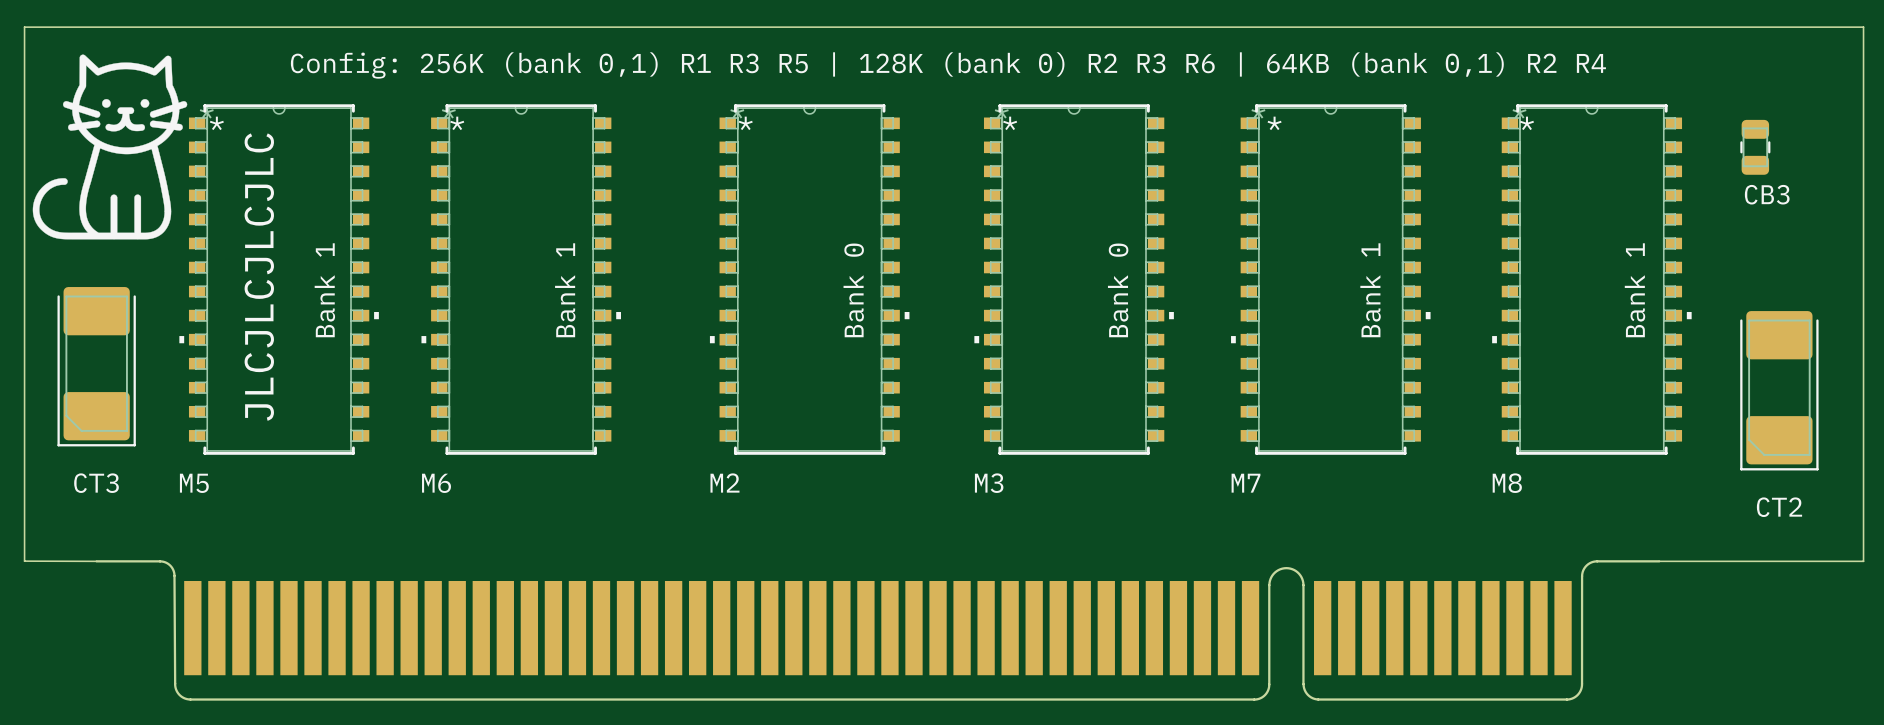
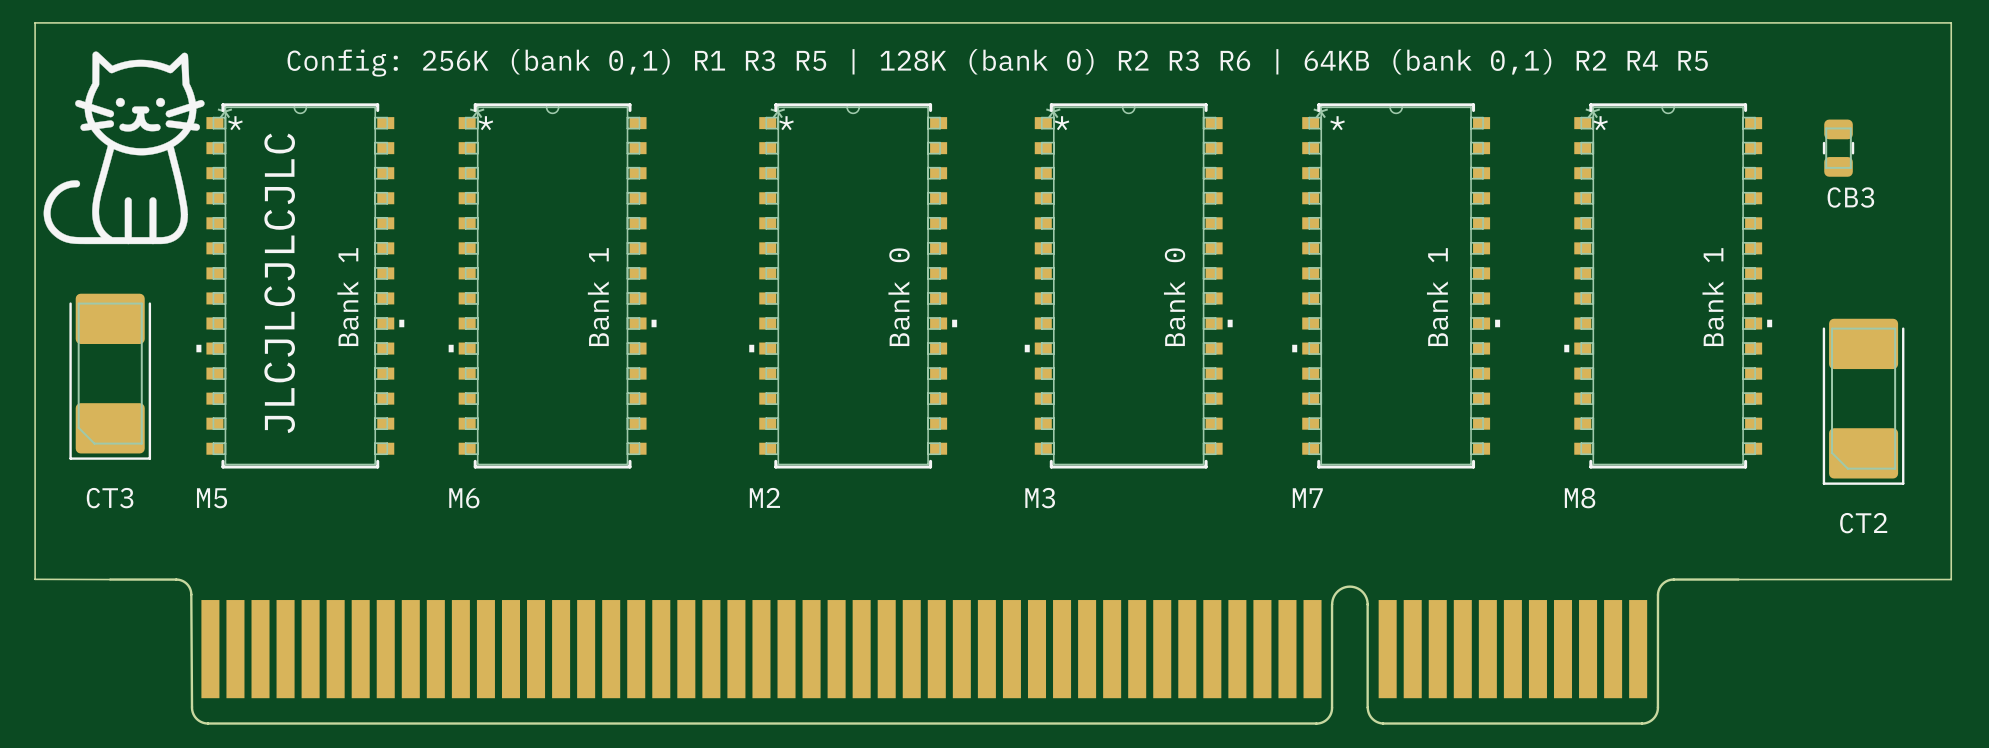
text: Config: 256K (bank 0,1) R1 R3 R5 | 128K (bank 0) R2 R3 R6 | 64KB (bank 0,1) R2 R4 (948, 65) -> Config: 256K (bank 0,1) R1 R3 R5 | 128K (bank 0) R2 R3 R6 | 64KB (bank 0,1) R2 R4 R5 (997, 62)

